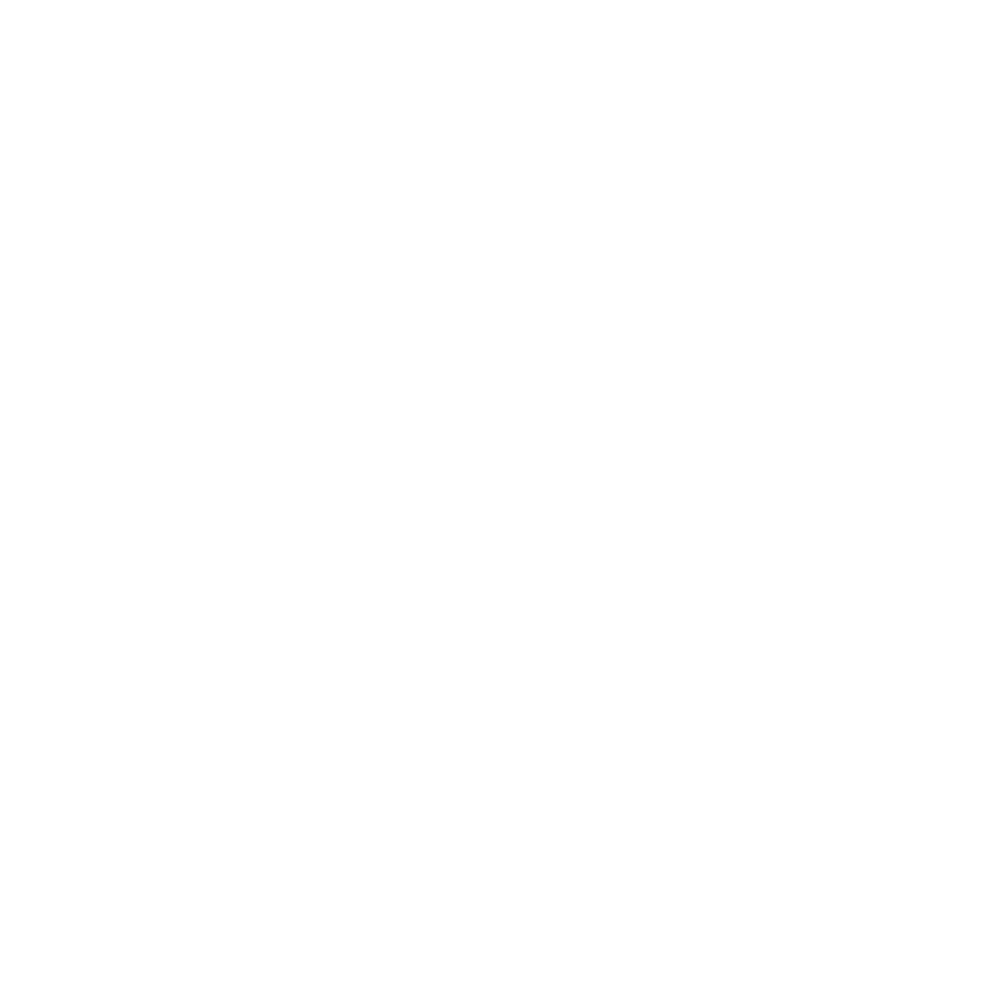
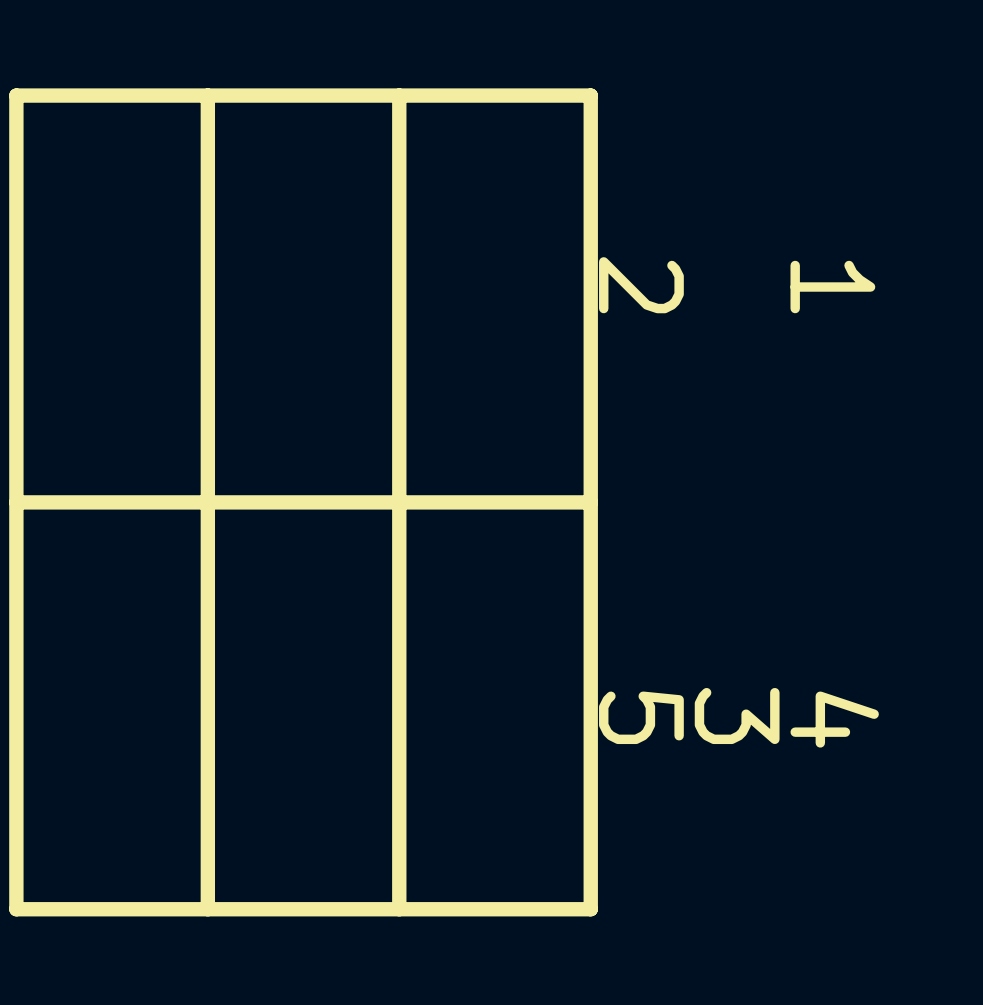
line: none -> (207, 95) (207, 909)
line: none -> (399, 95) (399, 909)
line: none -> (590, 95) (16, 95) (16, 909) (590, 909) (590, 95)
text: none -> 2 (641, 285)
text: none -> 1 (832, 287)
line: none -> (590, 502) (16, 502)
text: none -> 3 (737, 715)
text: none -> 4 (834, 719)
text: none -> 5 (641, 717)

